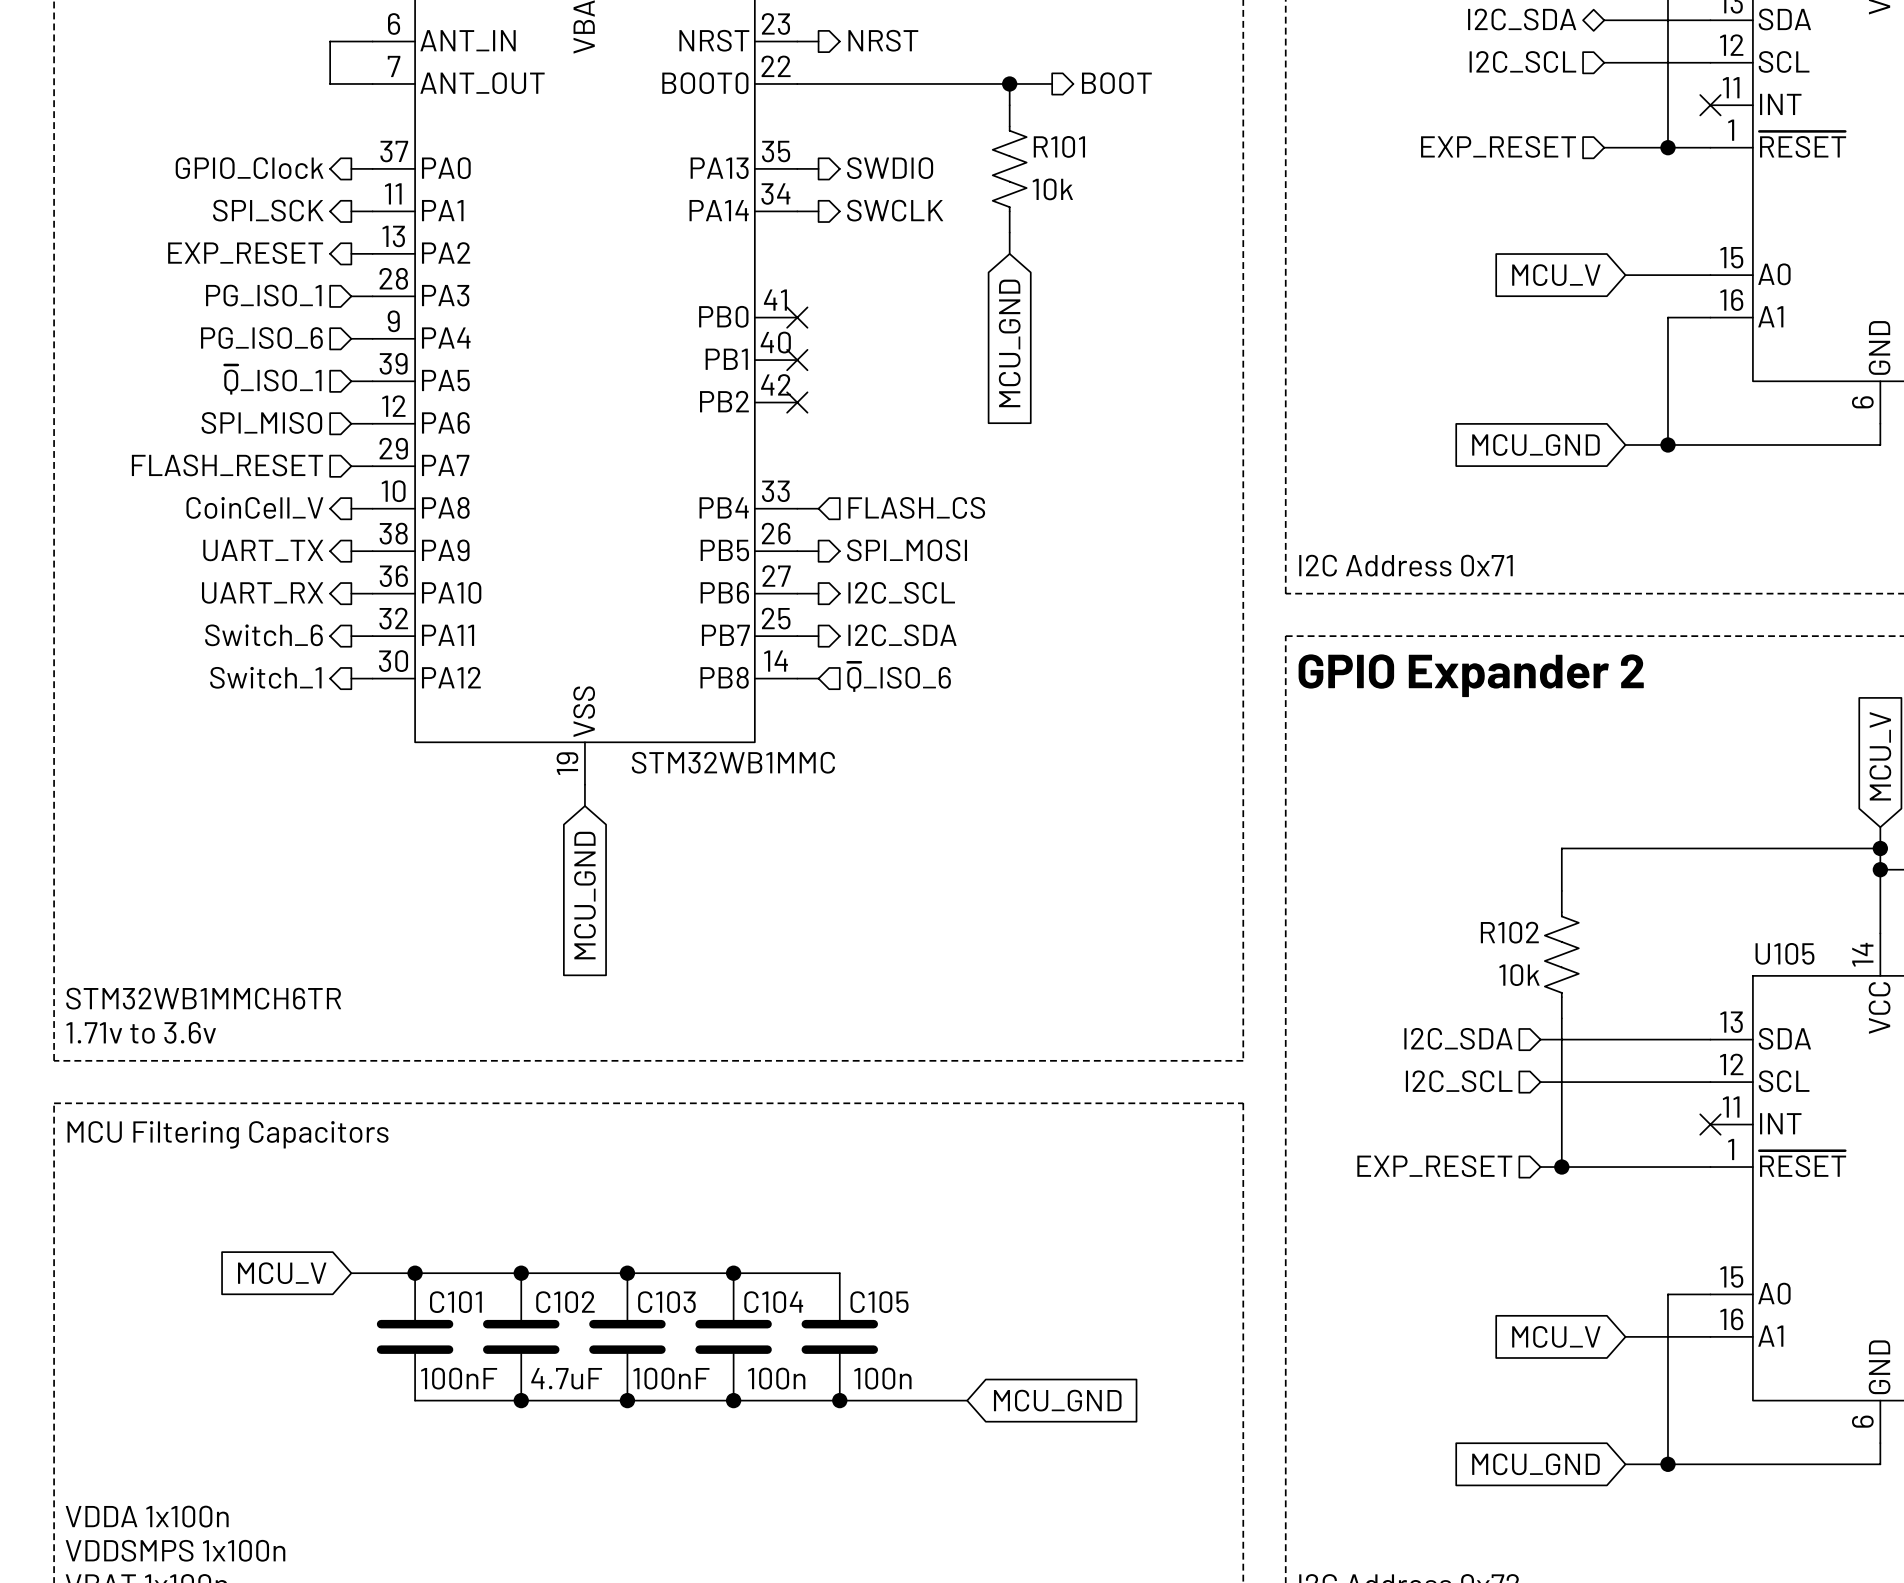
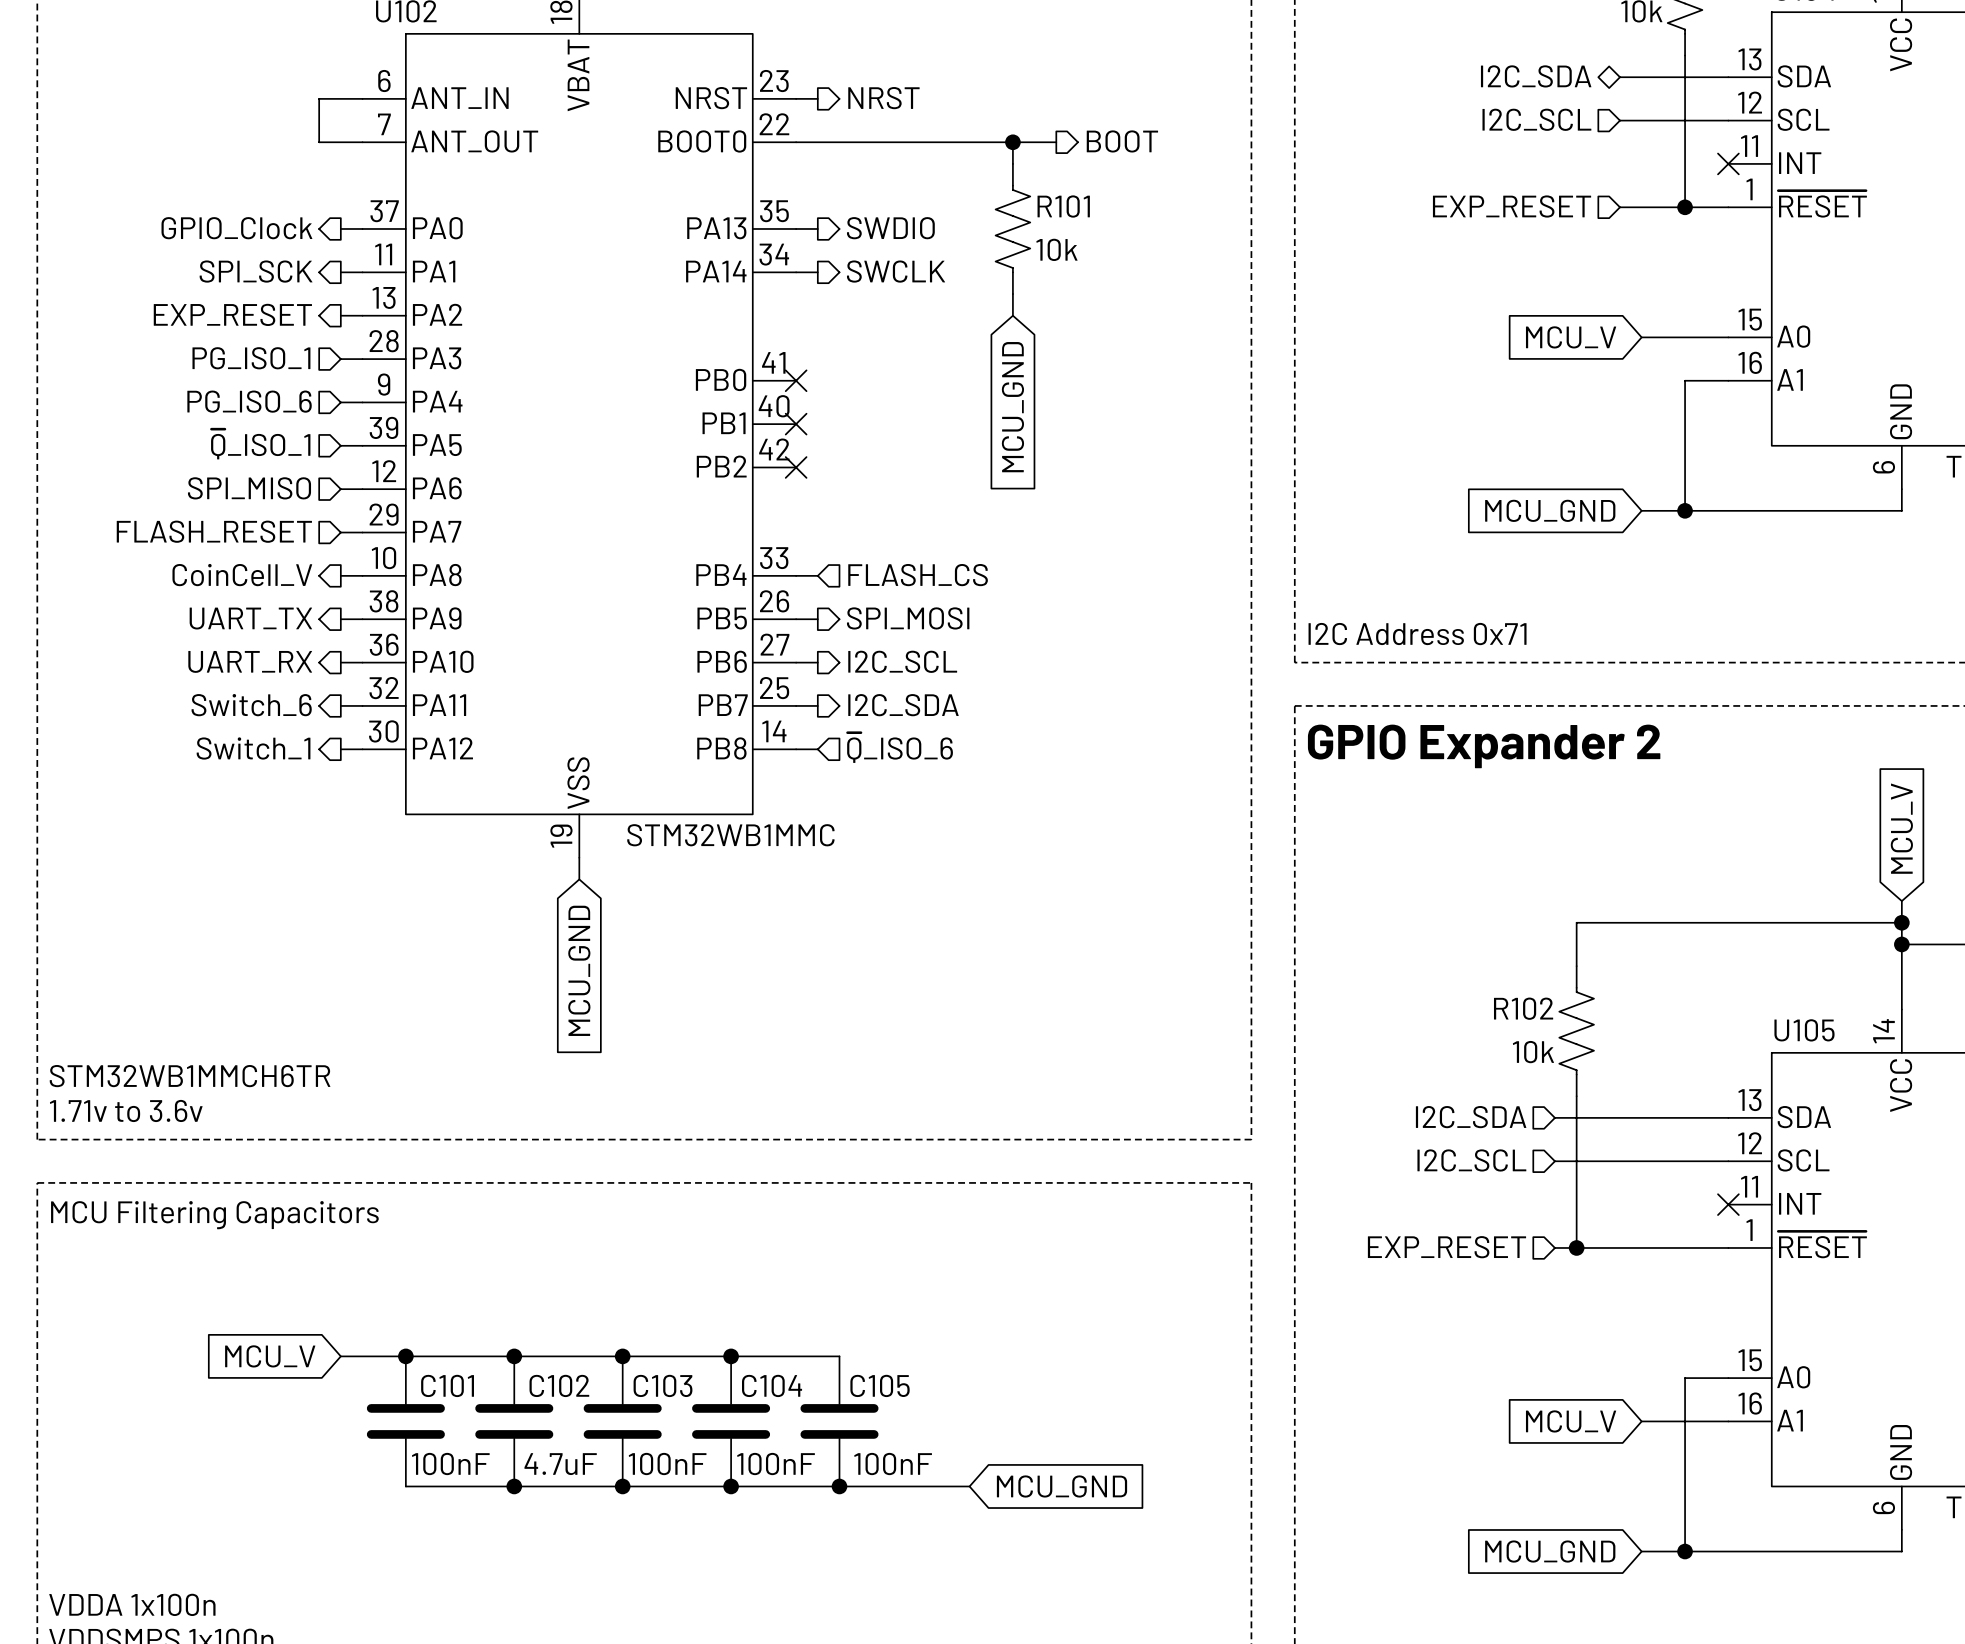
C104 value: 100n (776, 1378) -> 100nF (776, 1464)
C105 value: 100n (882, 1378) -> 100nF (893, 1464)

